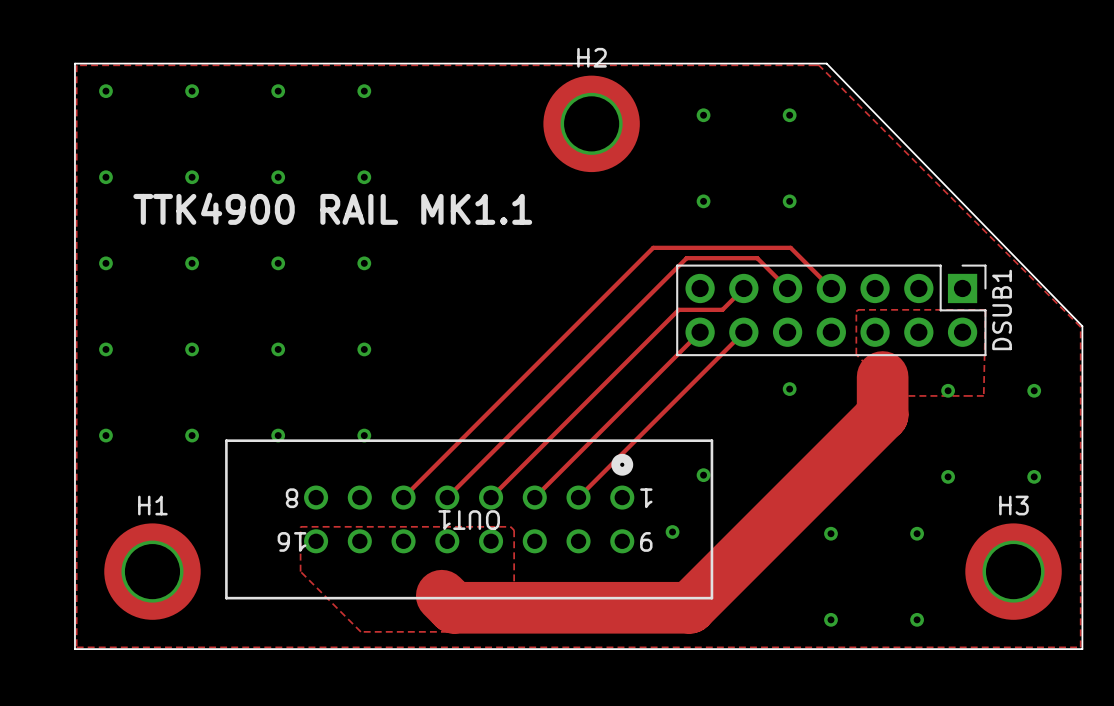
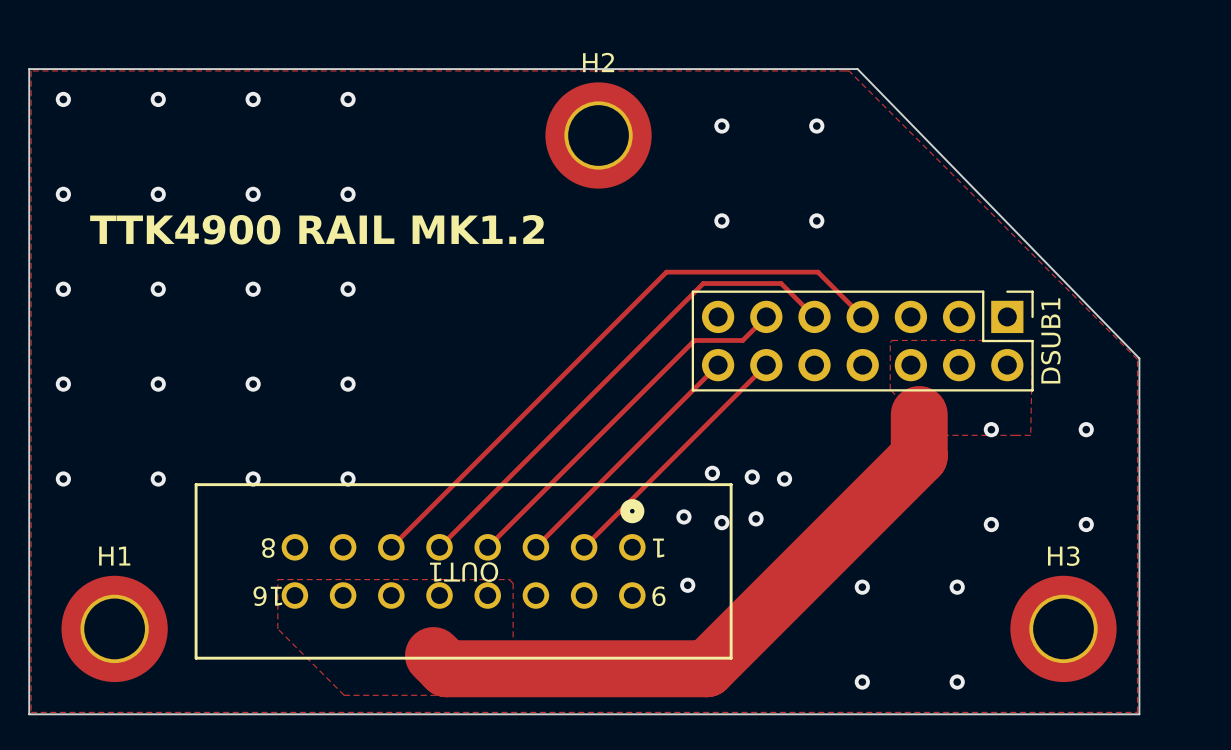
text: TTK4900 RAIL MK1.1 (332, 208) -> TTK4900 RAIL MK1.2 (317, 229)
via: (789, 389) -> none
via: none -> (712, 473)
via: none -> (752, 477)
via: none -> (784, 478)
via: none -> (683, 516)
via: none -> (756, 518)

